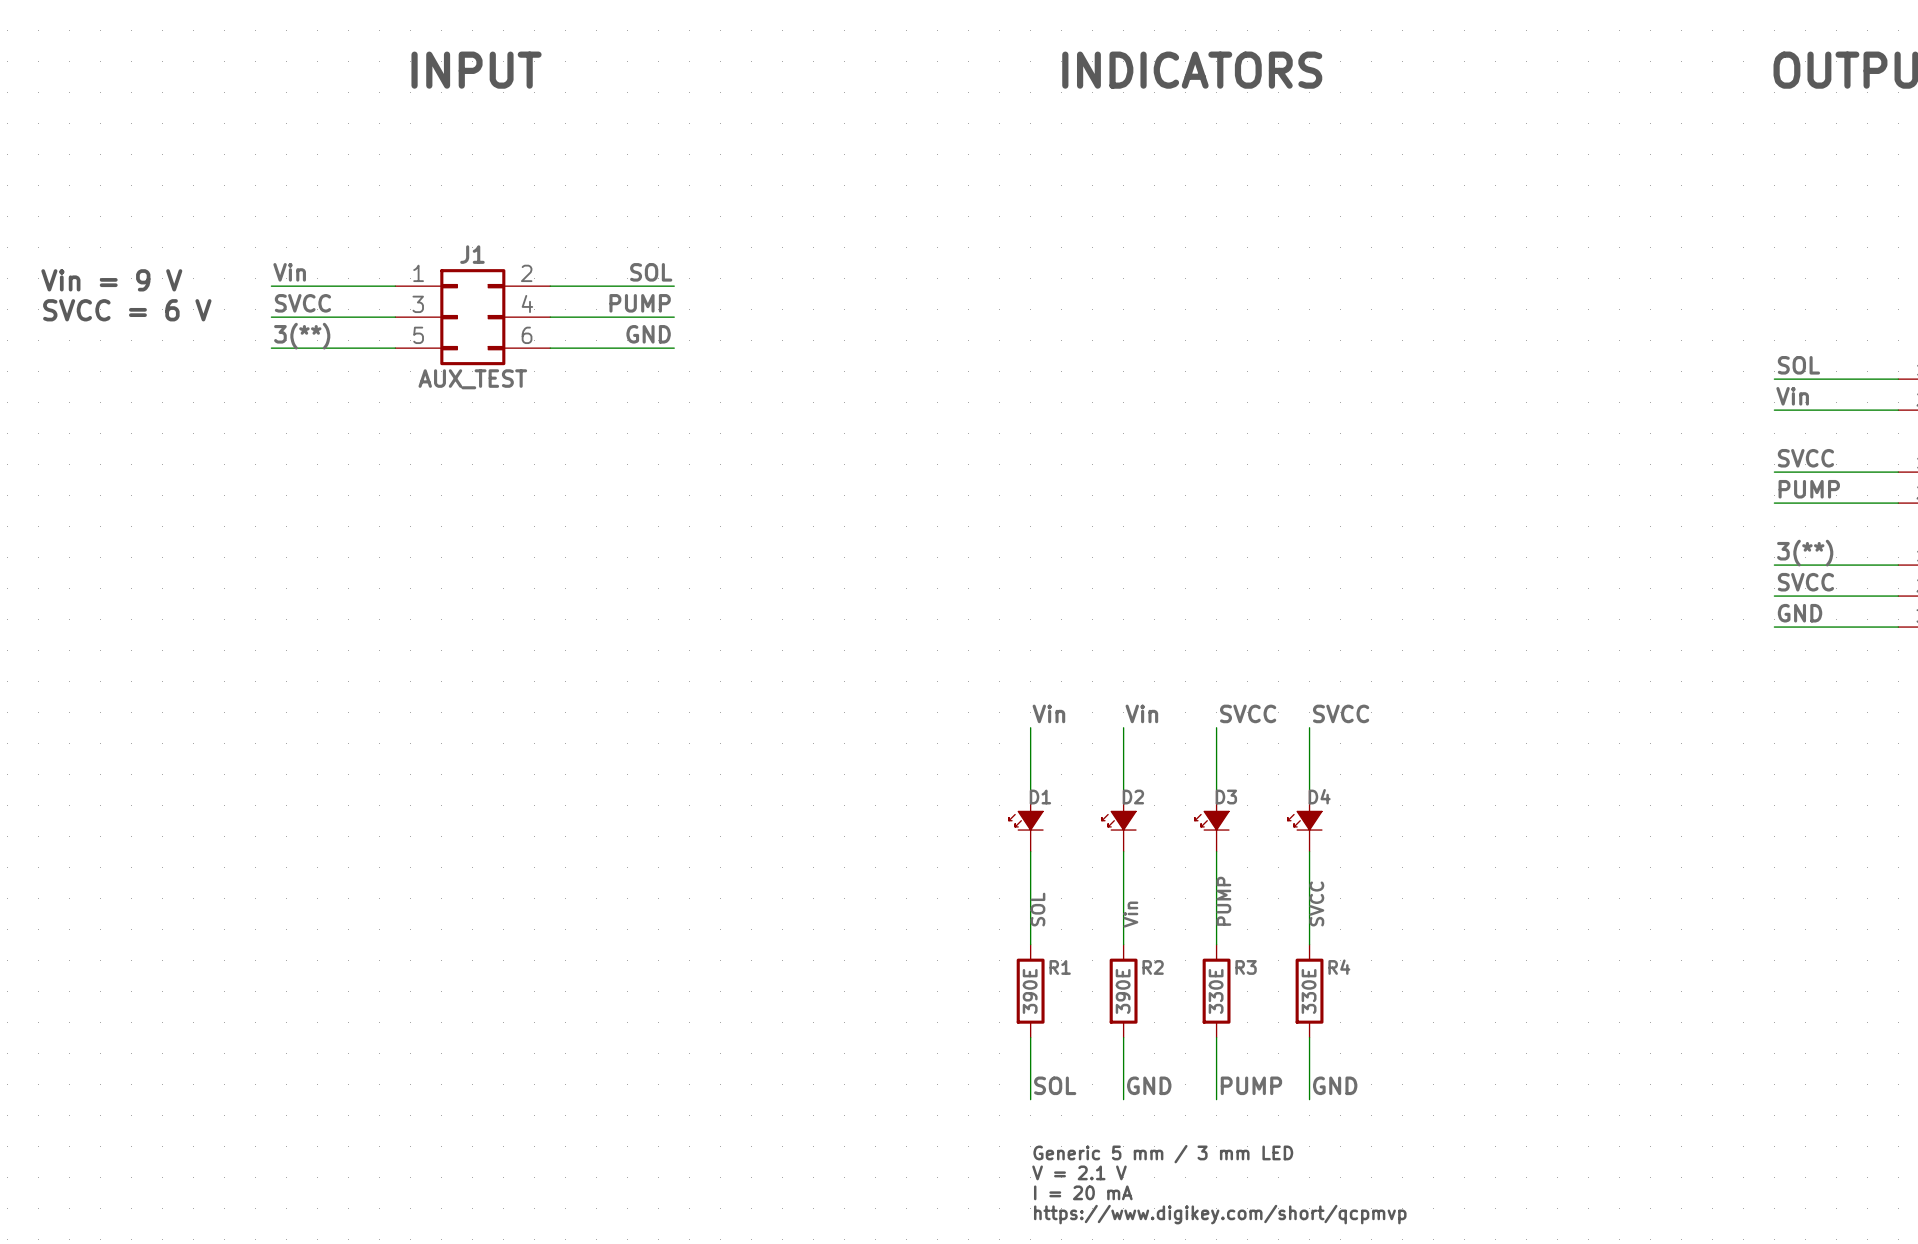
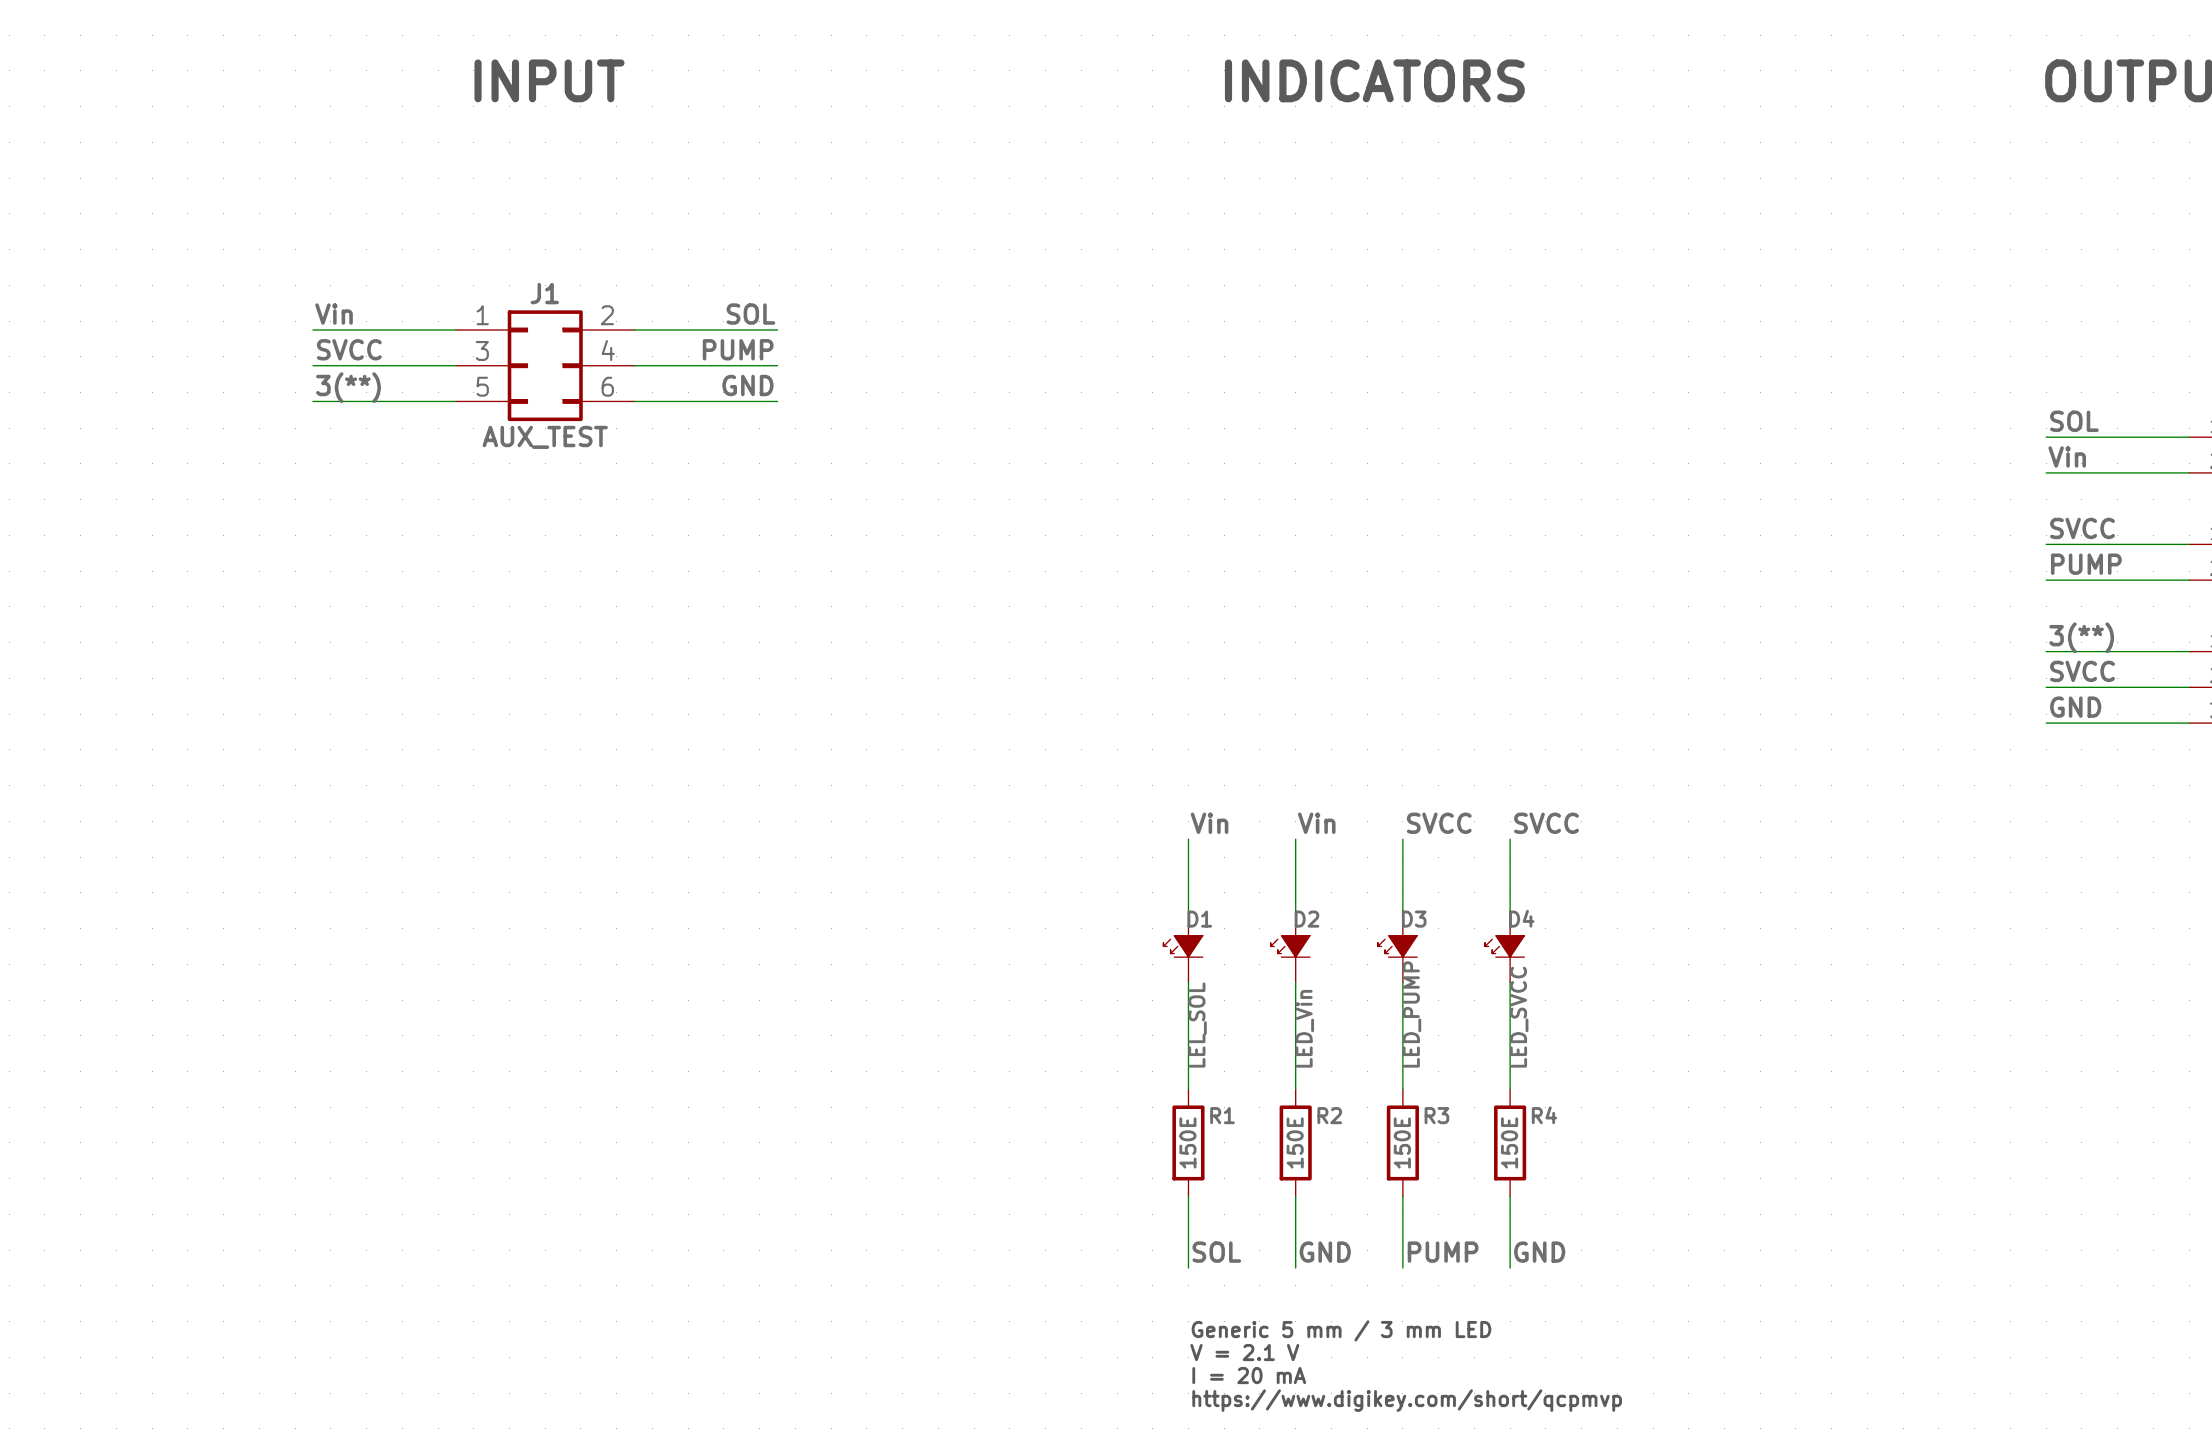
text: Vin = 9 V (111, 280) -> none
text: SVCC = 6 V (127, 310) -> none
D3 value: PUMP (1223, 901) -> LED_PUMP (1411, 1014)
D4 value: SVCC (1316, 903) -> LED_SVCC (1519, 1017)
D1 value: SOL (1037, 909) -> LEL_SOL (1197, 1025)
D2 value: Vin (1130, 914) -> LED_Vin (1304, 1028)
R1 value: 390E (1030, 991) -> 150E (1187, 1142)
R2 value: 390E (1123, 991) -> 150E (1295, 1142)
R3 value: 330E (1216, 991) -> 150E (1402, 1142)
R4 value: 330E (1309, 991) -> 150E (1509, 1142)

